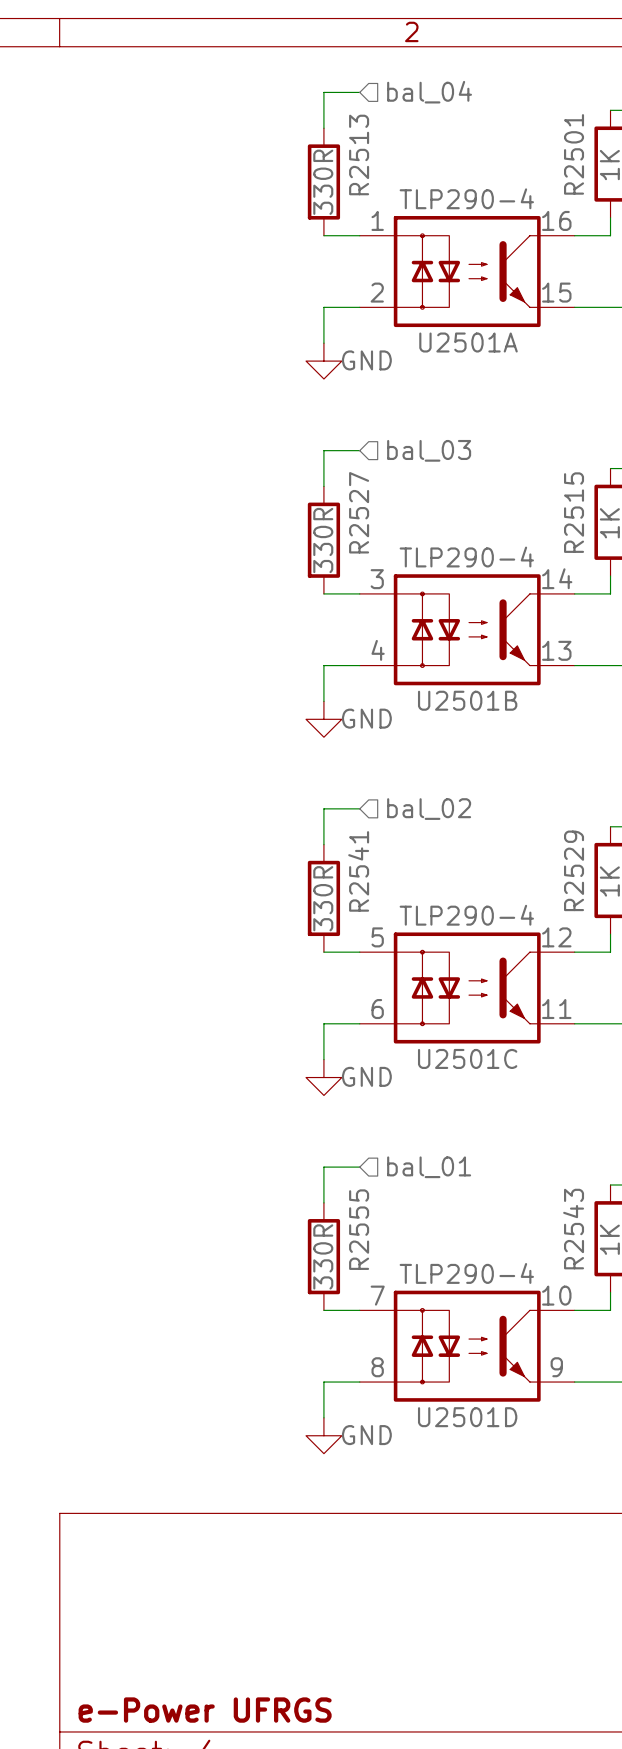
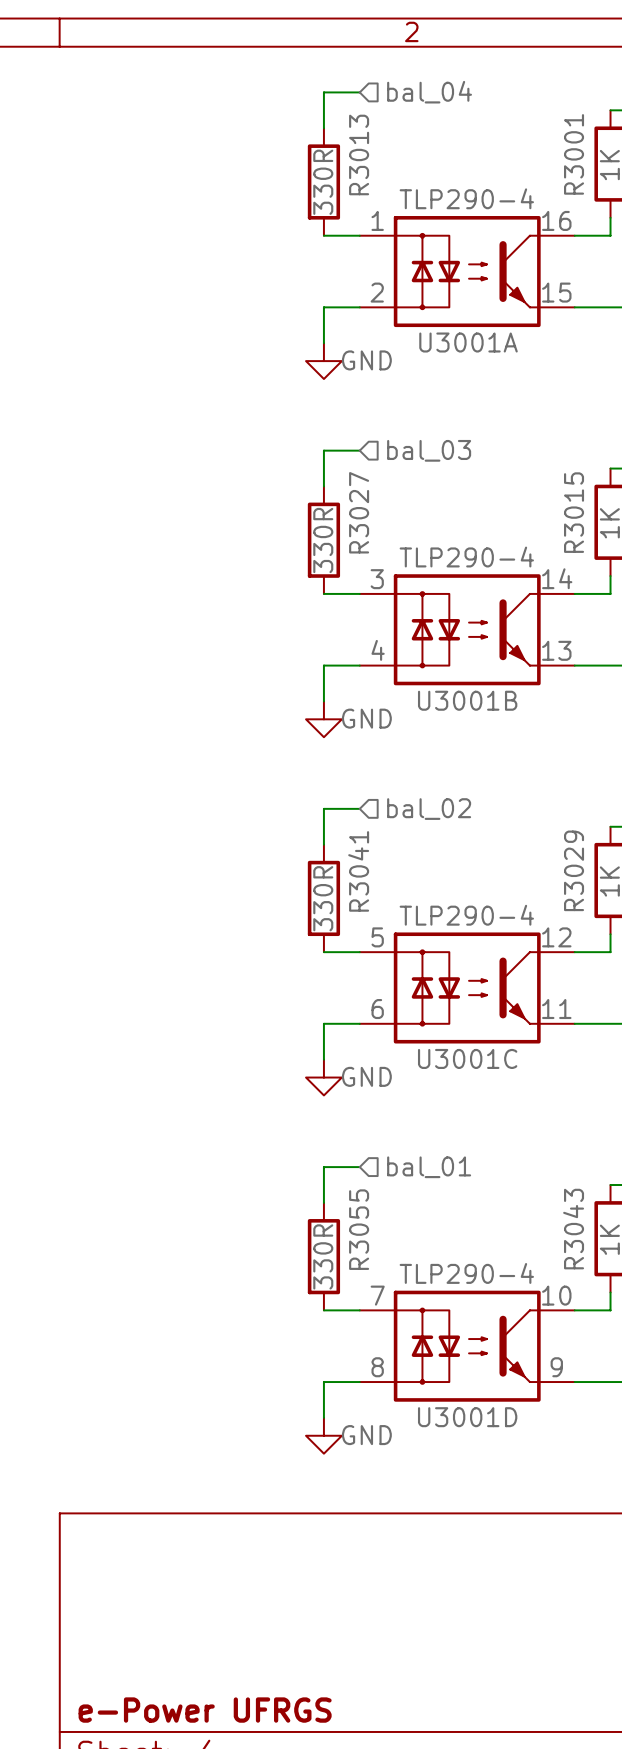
R2513 name: R2513 (359, 154) -> R3013 (359, 154)
R2501 name: R2501 (574, 154) -> R3001 (574, 154)
U2501A name: U2501A (468, 342) -> U3001A (468, 342)
R2527 name: R2527 (359, 512) -> R3027 (359, 512)
R2515 name: R2515 (574, 512) -> R3015 (574, 512)
U2501B name: U2501B (467, 700) -> U3001B (467, 700)
R2529 name: R2529 (574, 870) -> R3029 (574, 870)
R2541 name: R2541 (358, 871) -> R3041 (358, 871)
U2501C name: U2501C (467, 1058) -> U3001C (467, 1058)
R2555 name: R2555 (359, 1229) -> R3055 (359, 1229)
R2543 name: R2543 (573, 1229) -> R3043 (573, 1229)
U2501D name: U2501D (467, 1417) -> U3001D (467, 1417)

